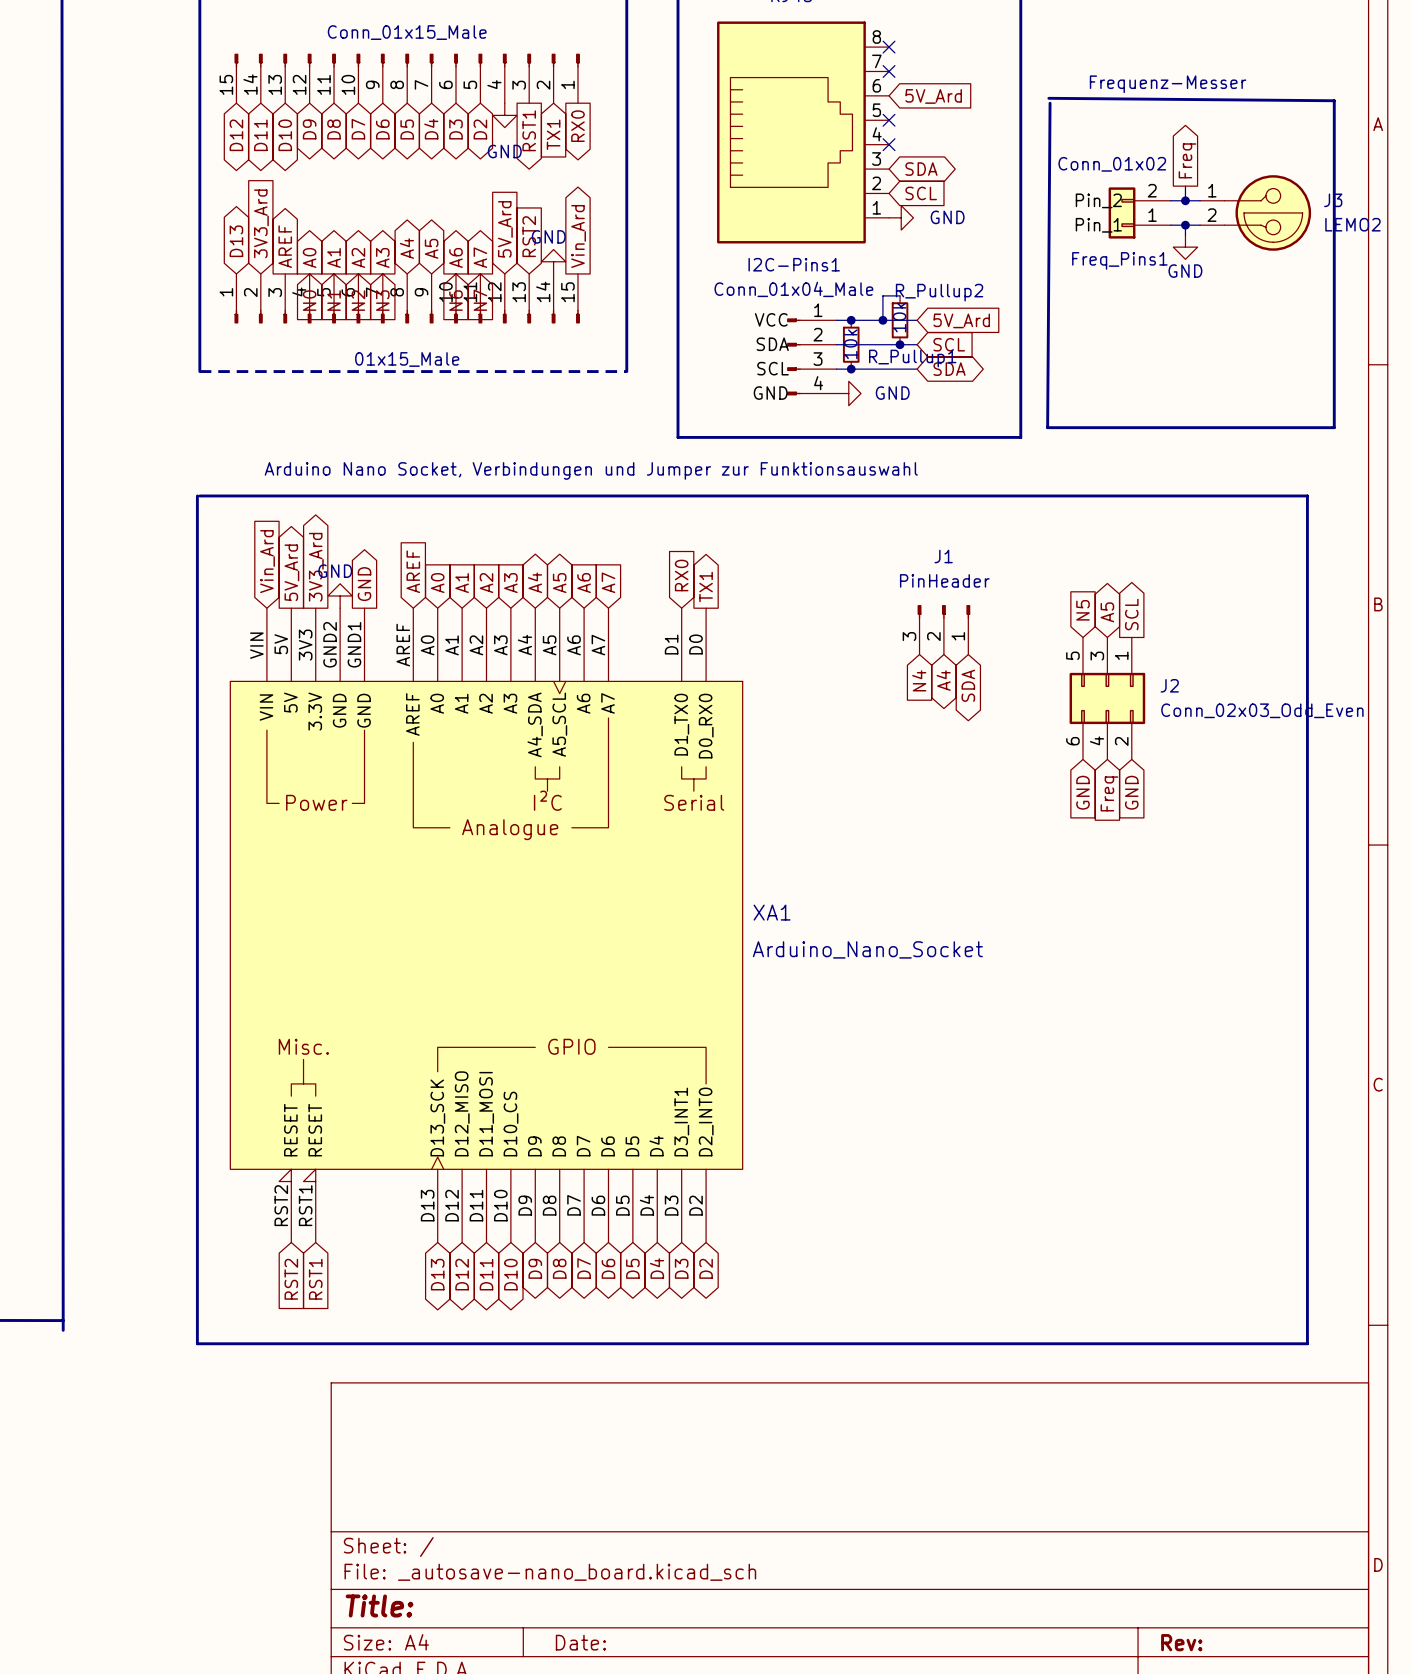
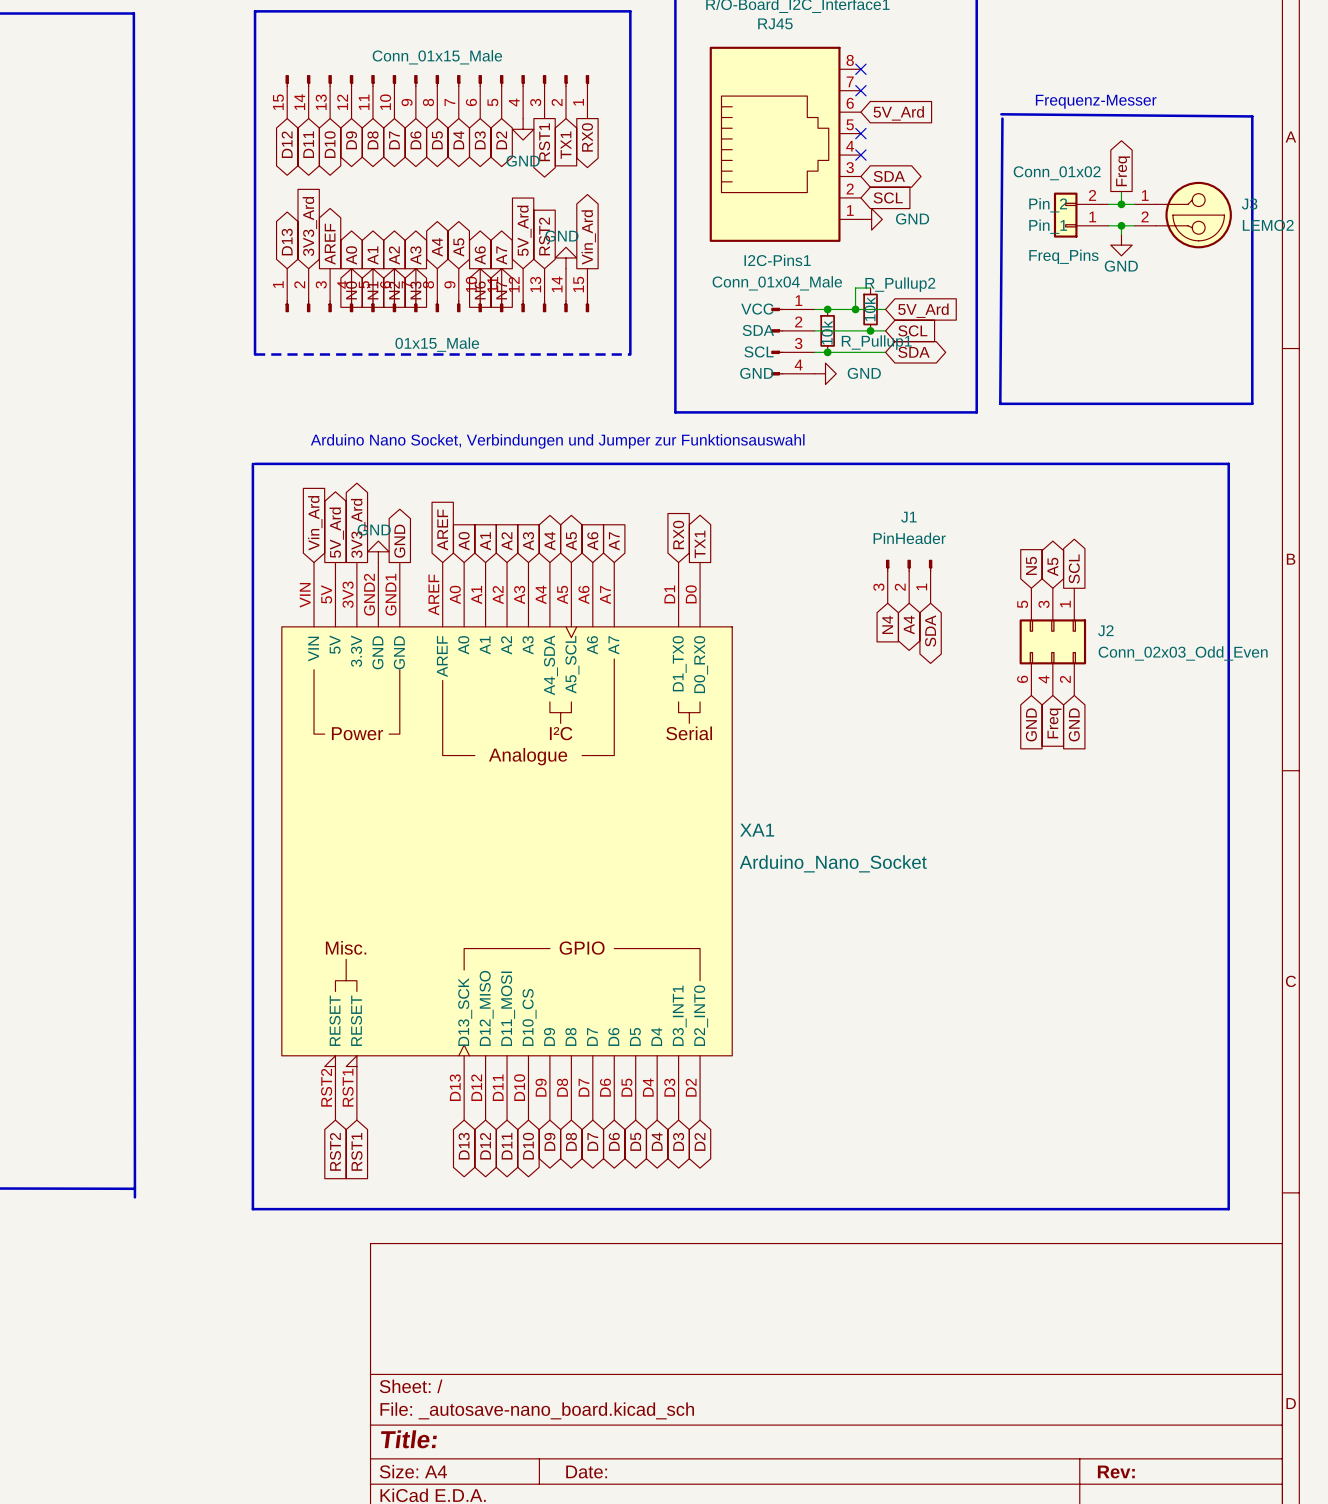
Freq_Pins1 name: Freq_Pins1 (1119, 260) -> Freq_Pins (1063, 256)

